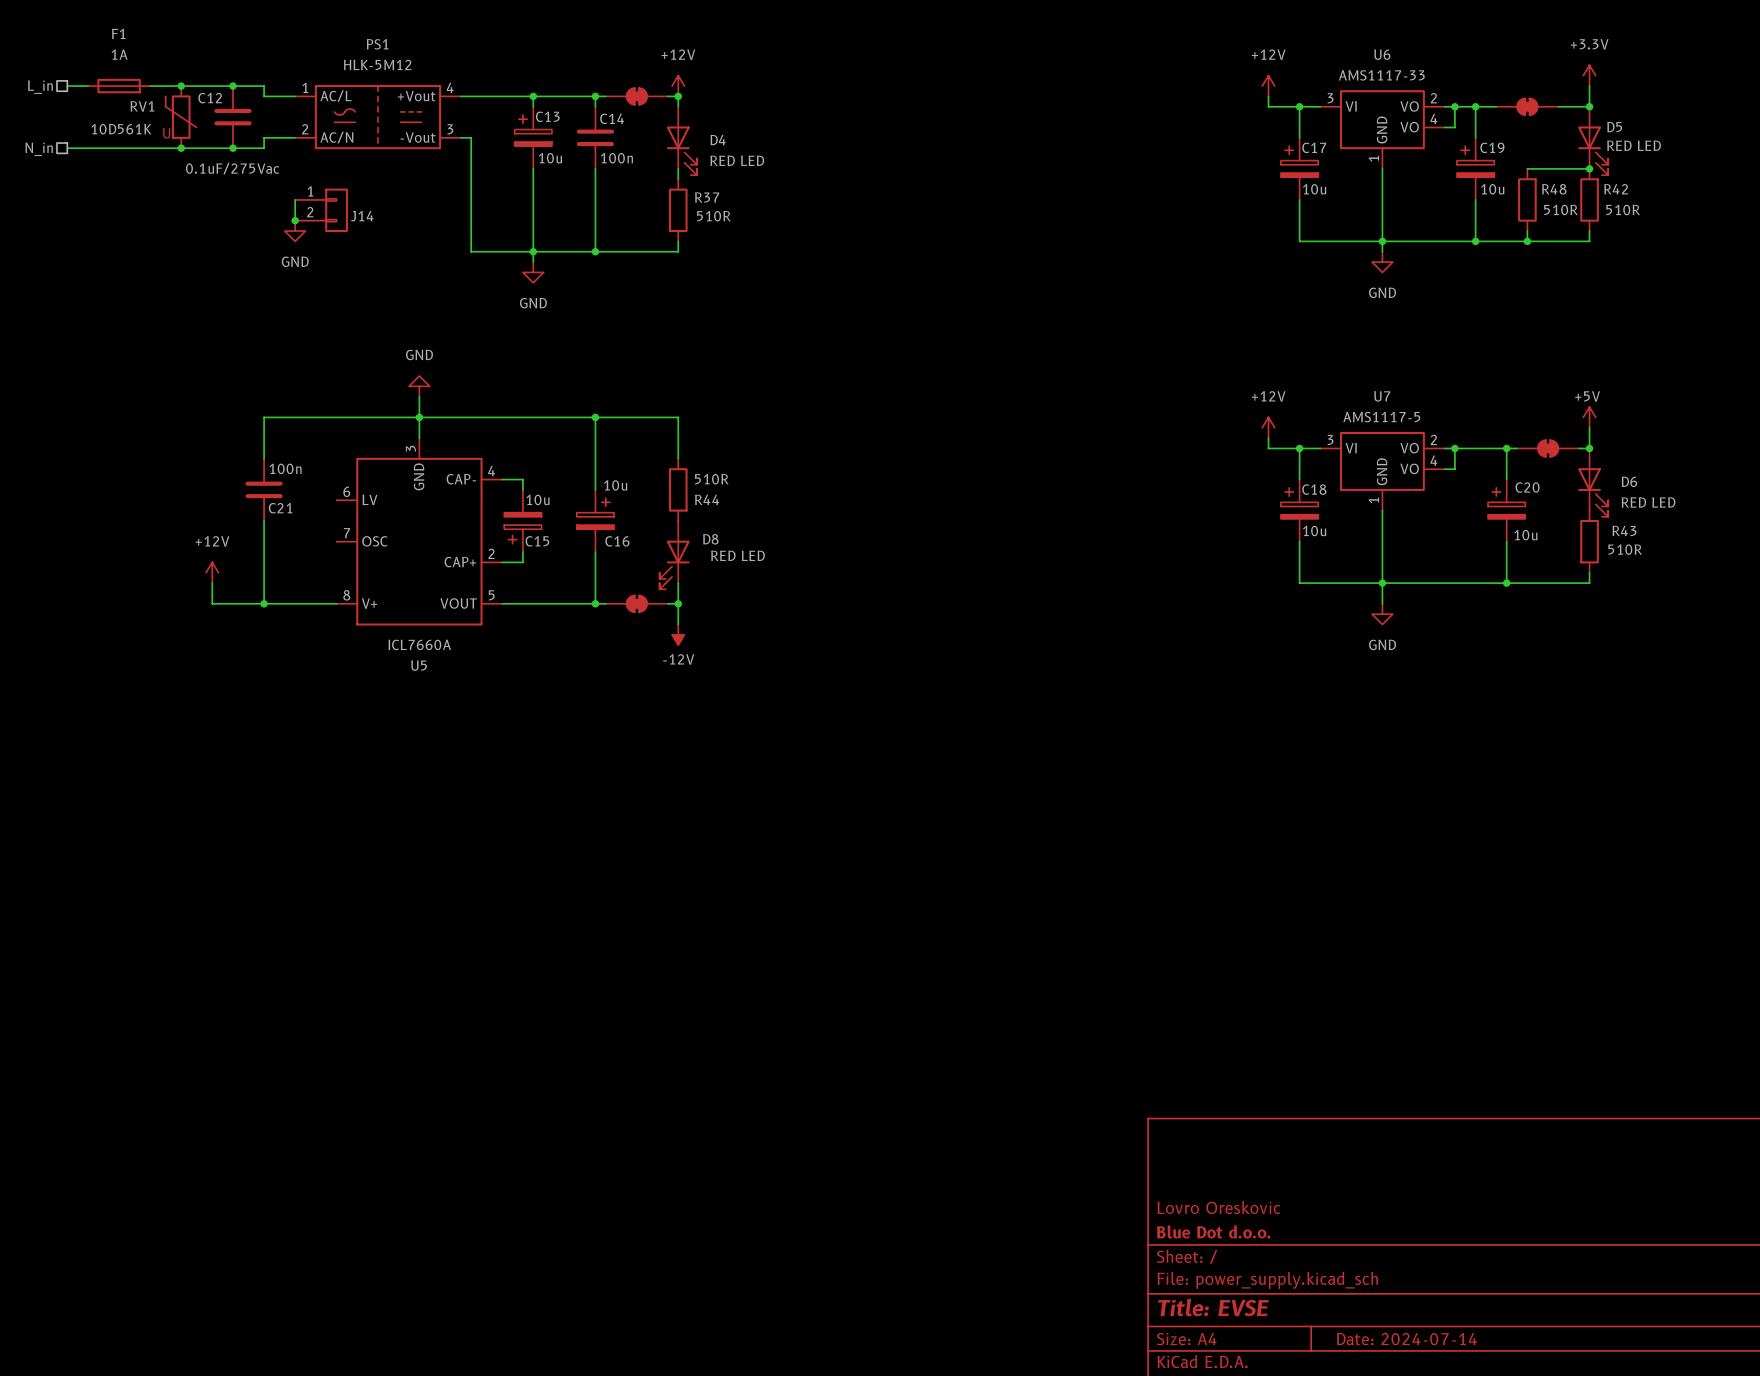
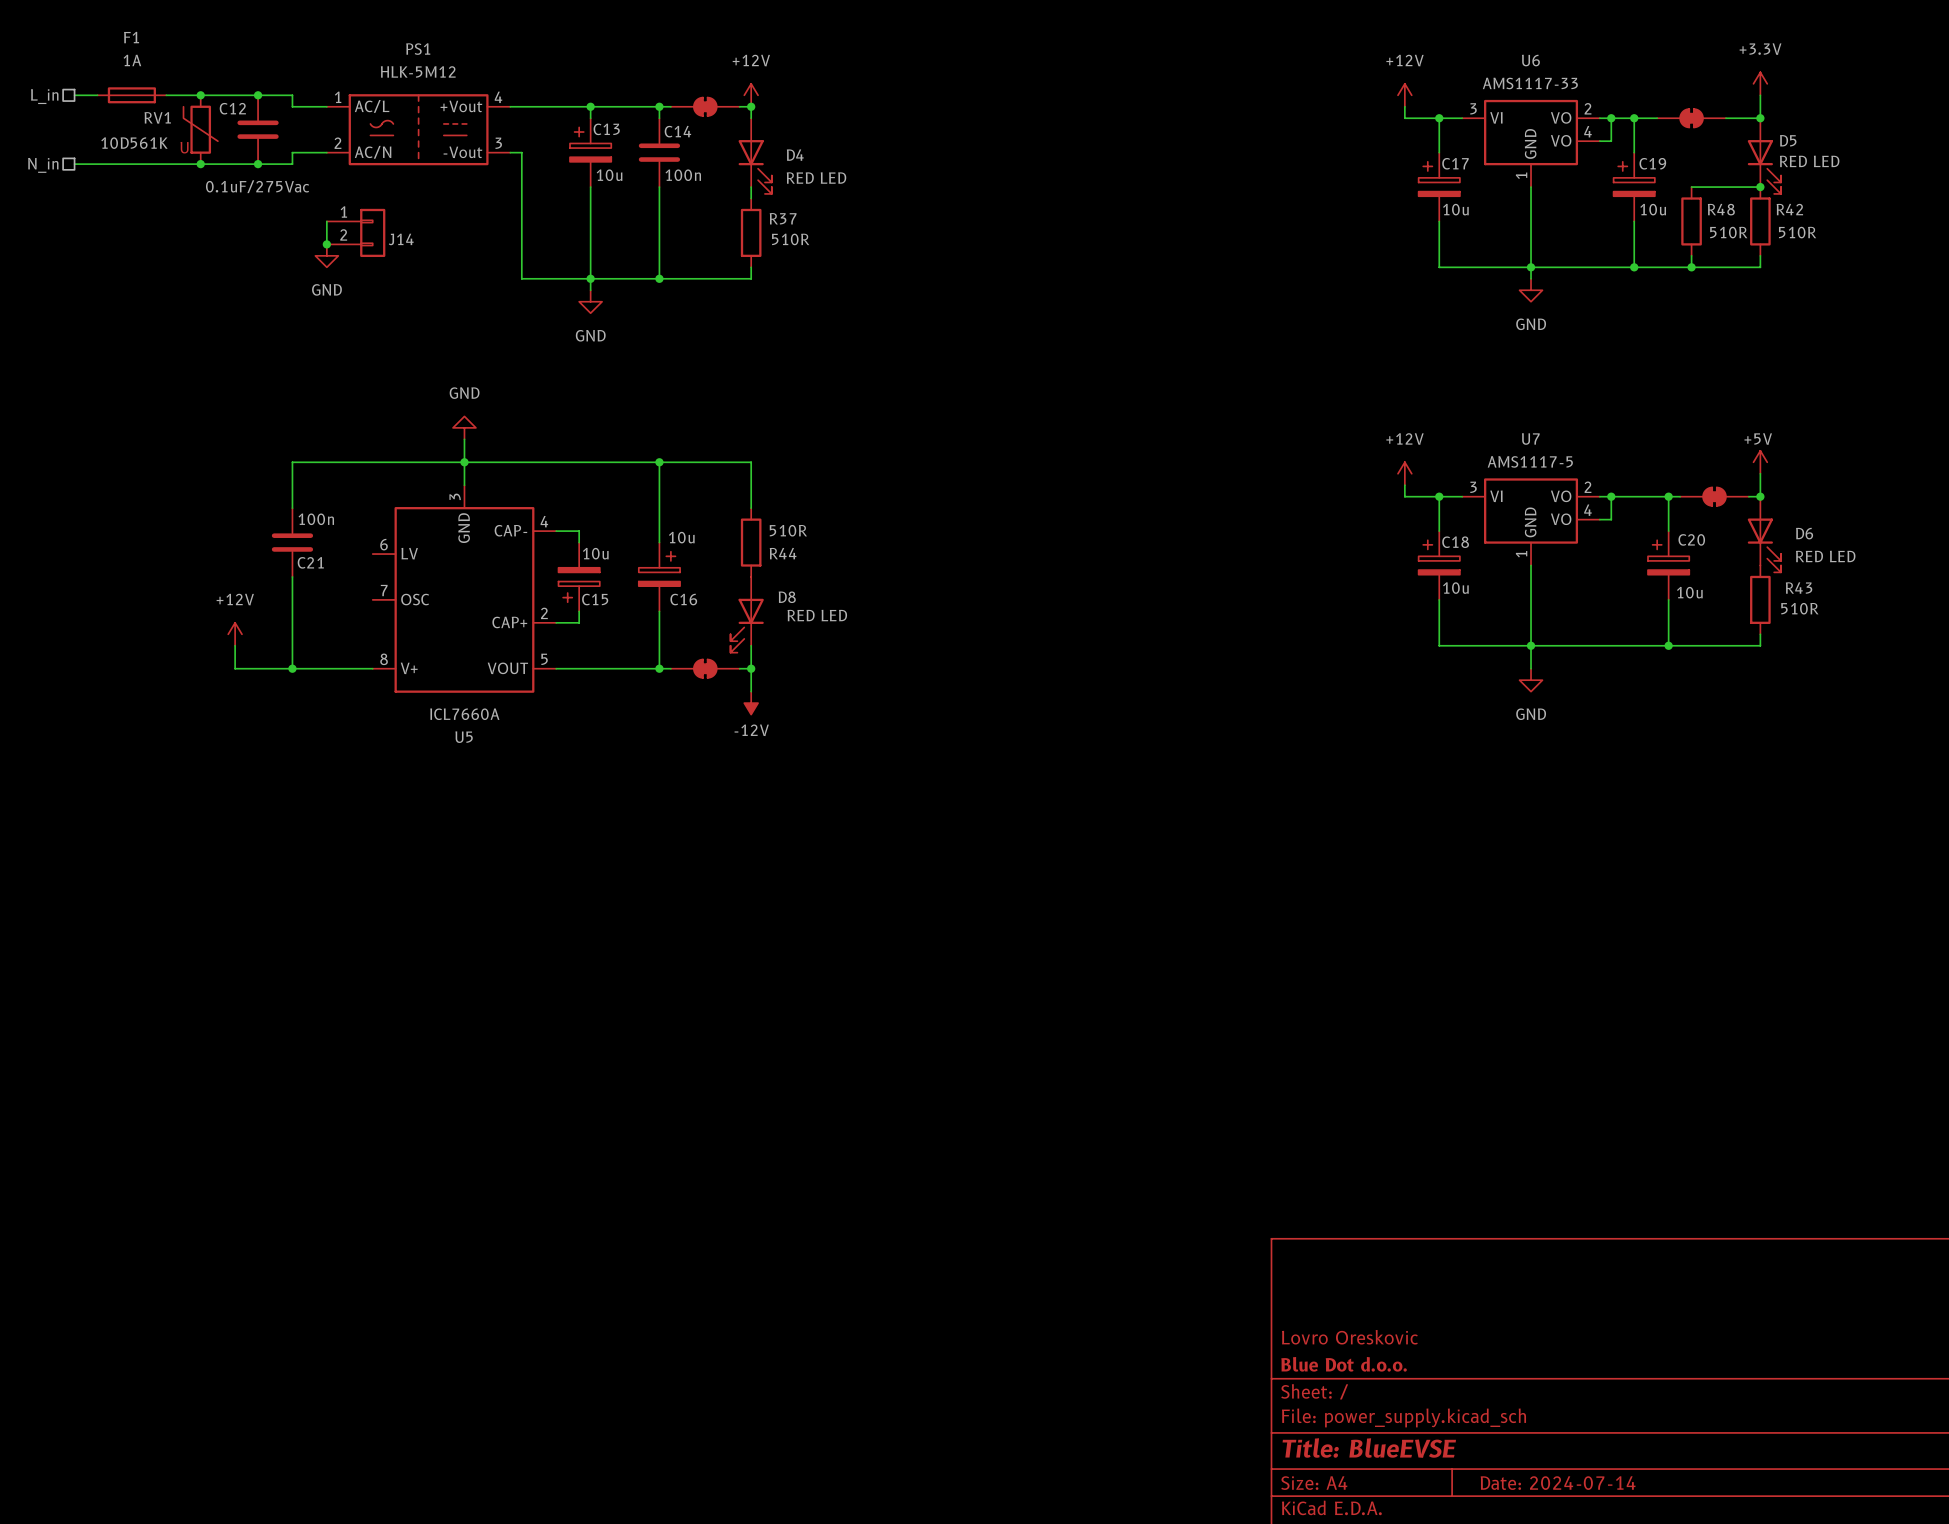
title block: Title: EVSE (1213, 1307) -> Title: BlueEVSE (1369, 1448)

